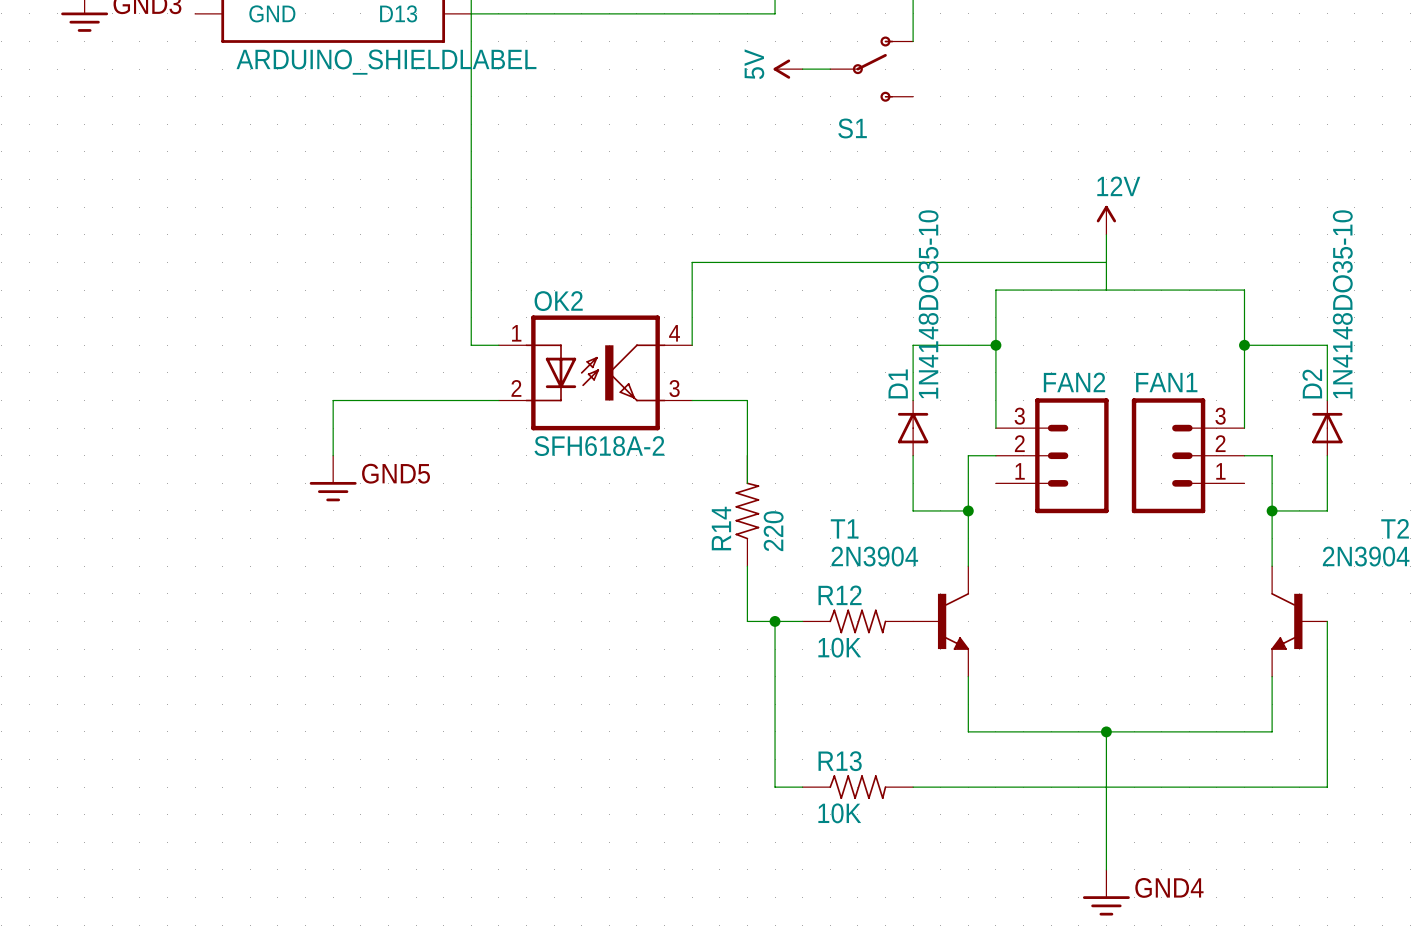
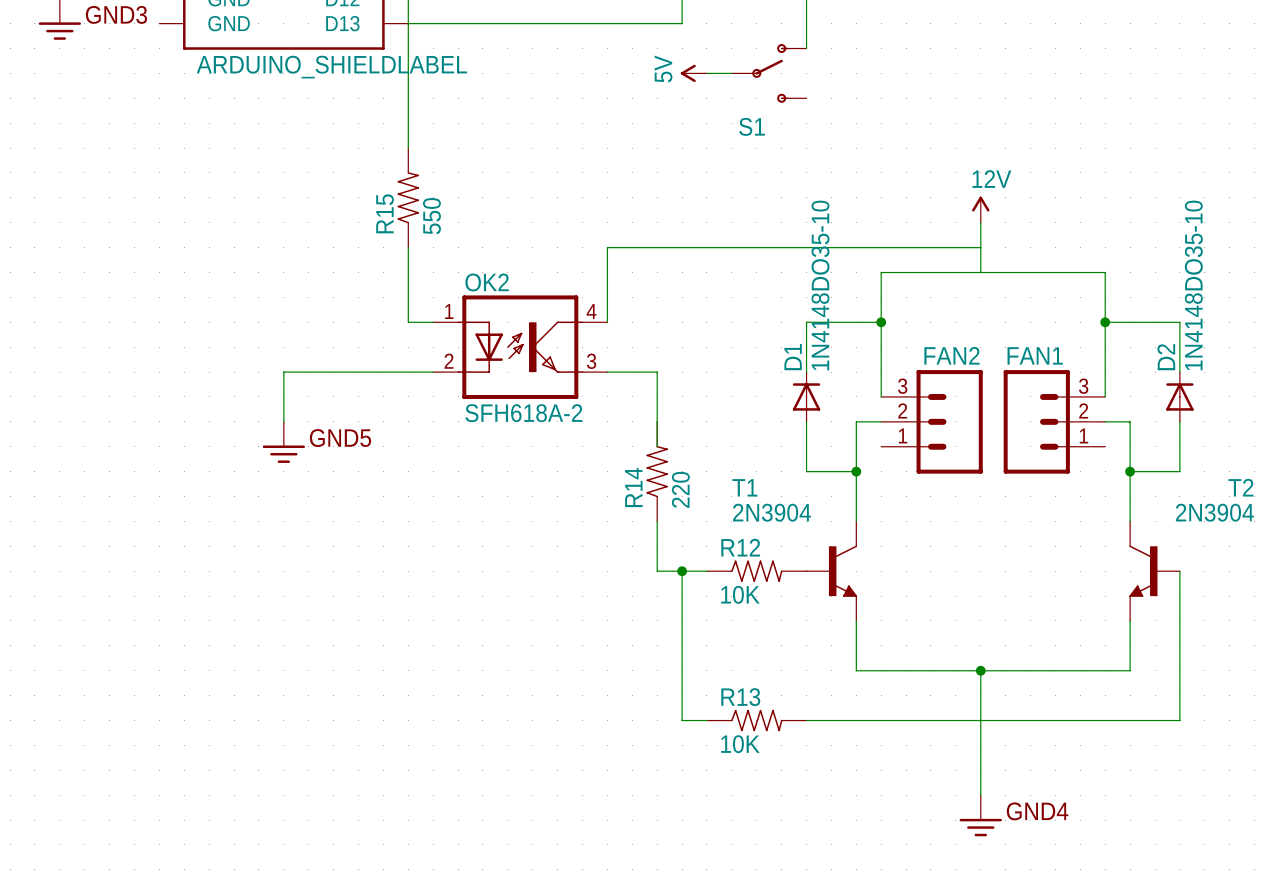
R15: none -> 550 (408, 197)

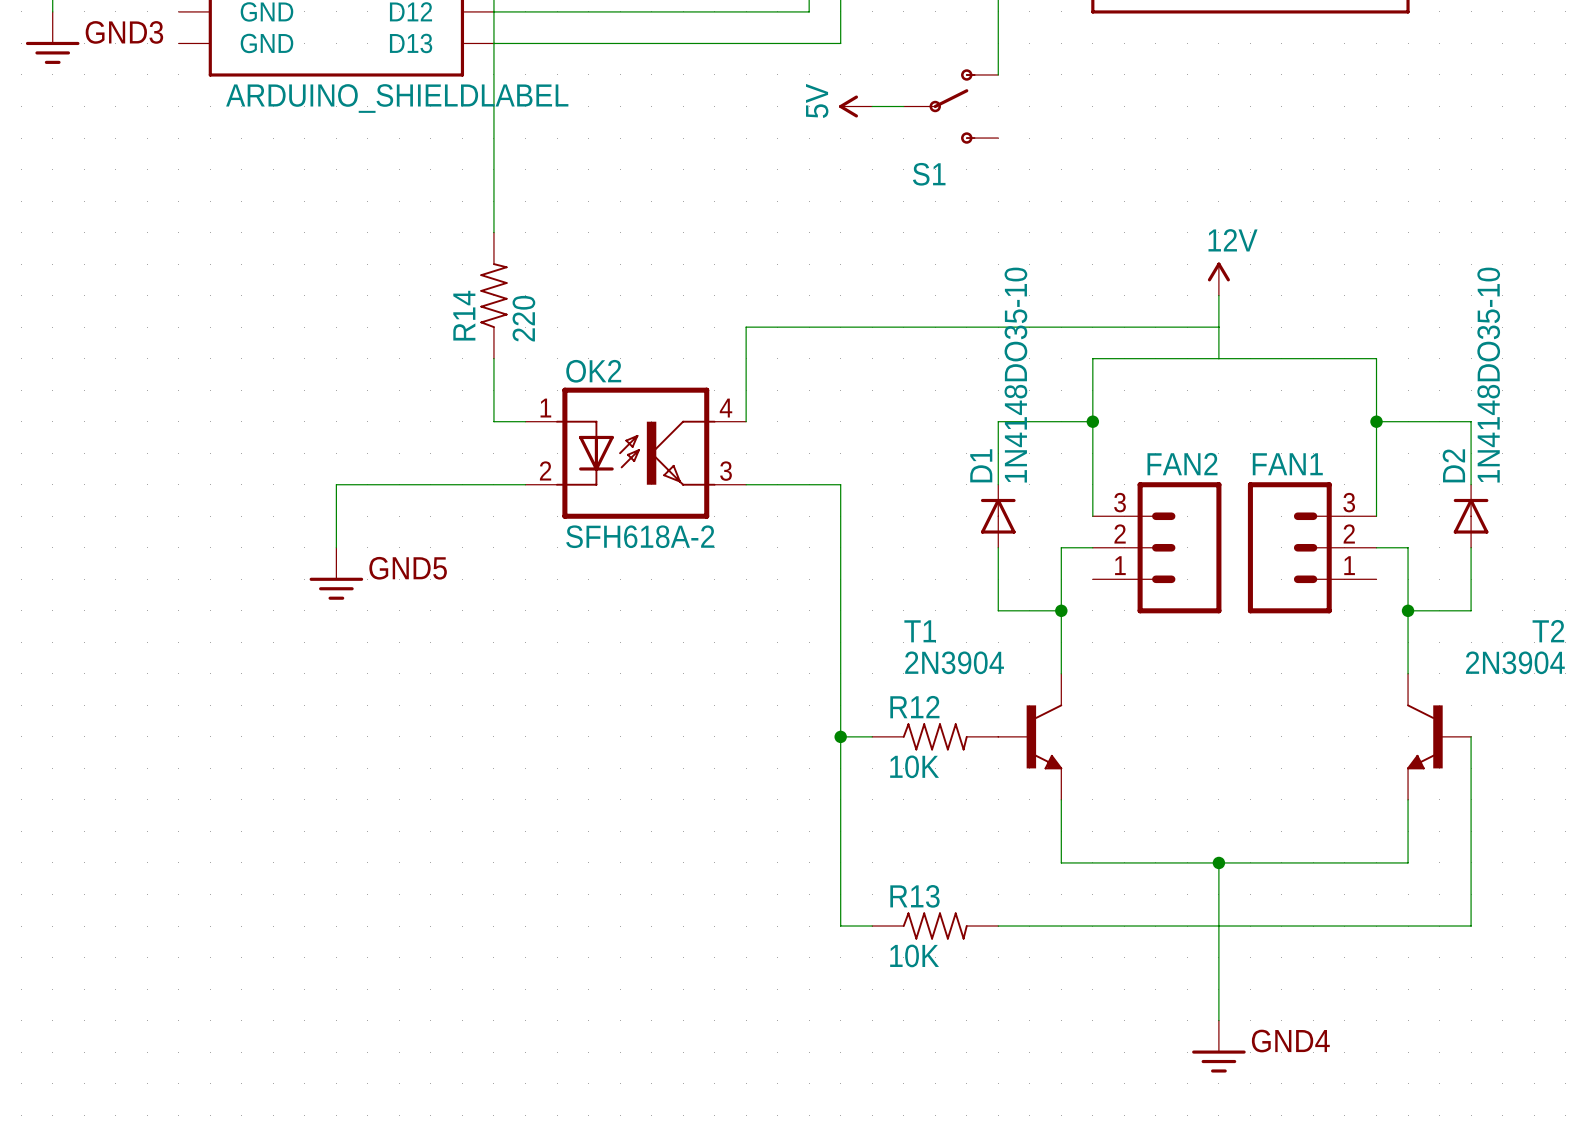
R15: 550 (408, 197) -> none
wire: (657, 372) (657, 446) -> (809, 484) (840, 484) (840, 736)
R14 position: (657, 471) -> (493, 295)
wire: (657, 521) (657, 571) (682, 571) -> none

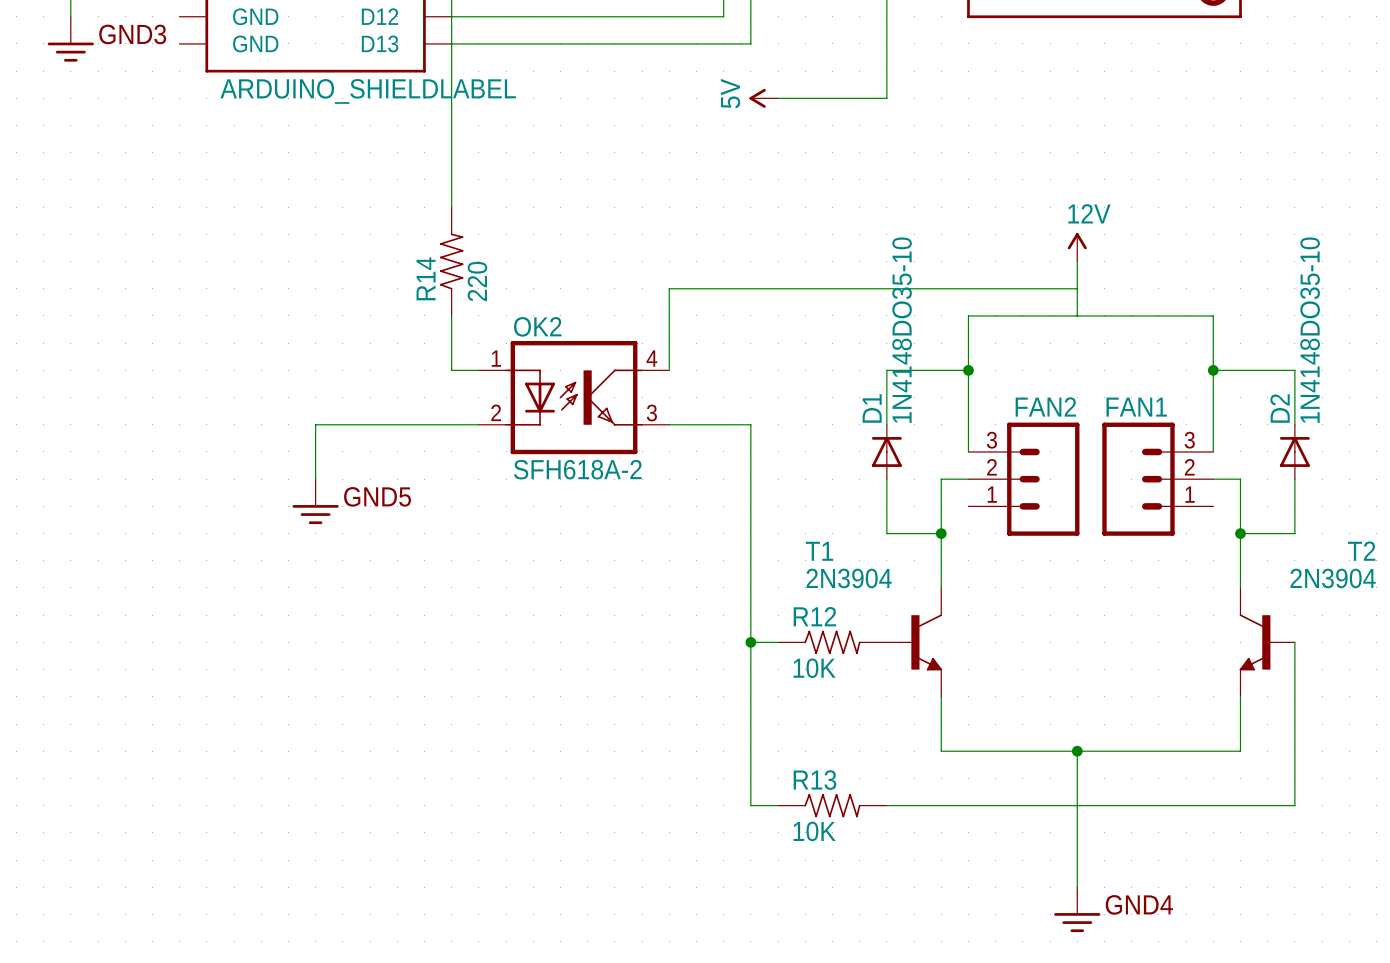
wire: none -> (886, 71) (886, 98) (805, 98)
S1: (951, 106) -> none

